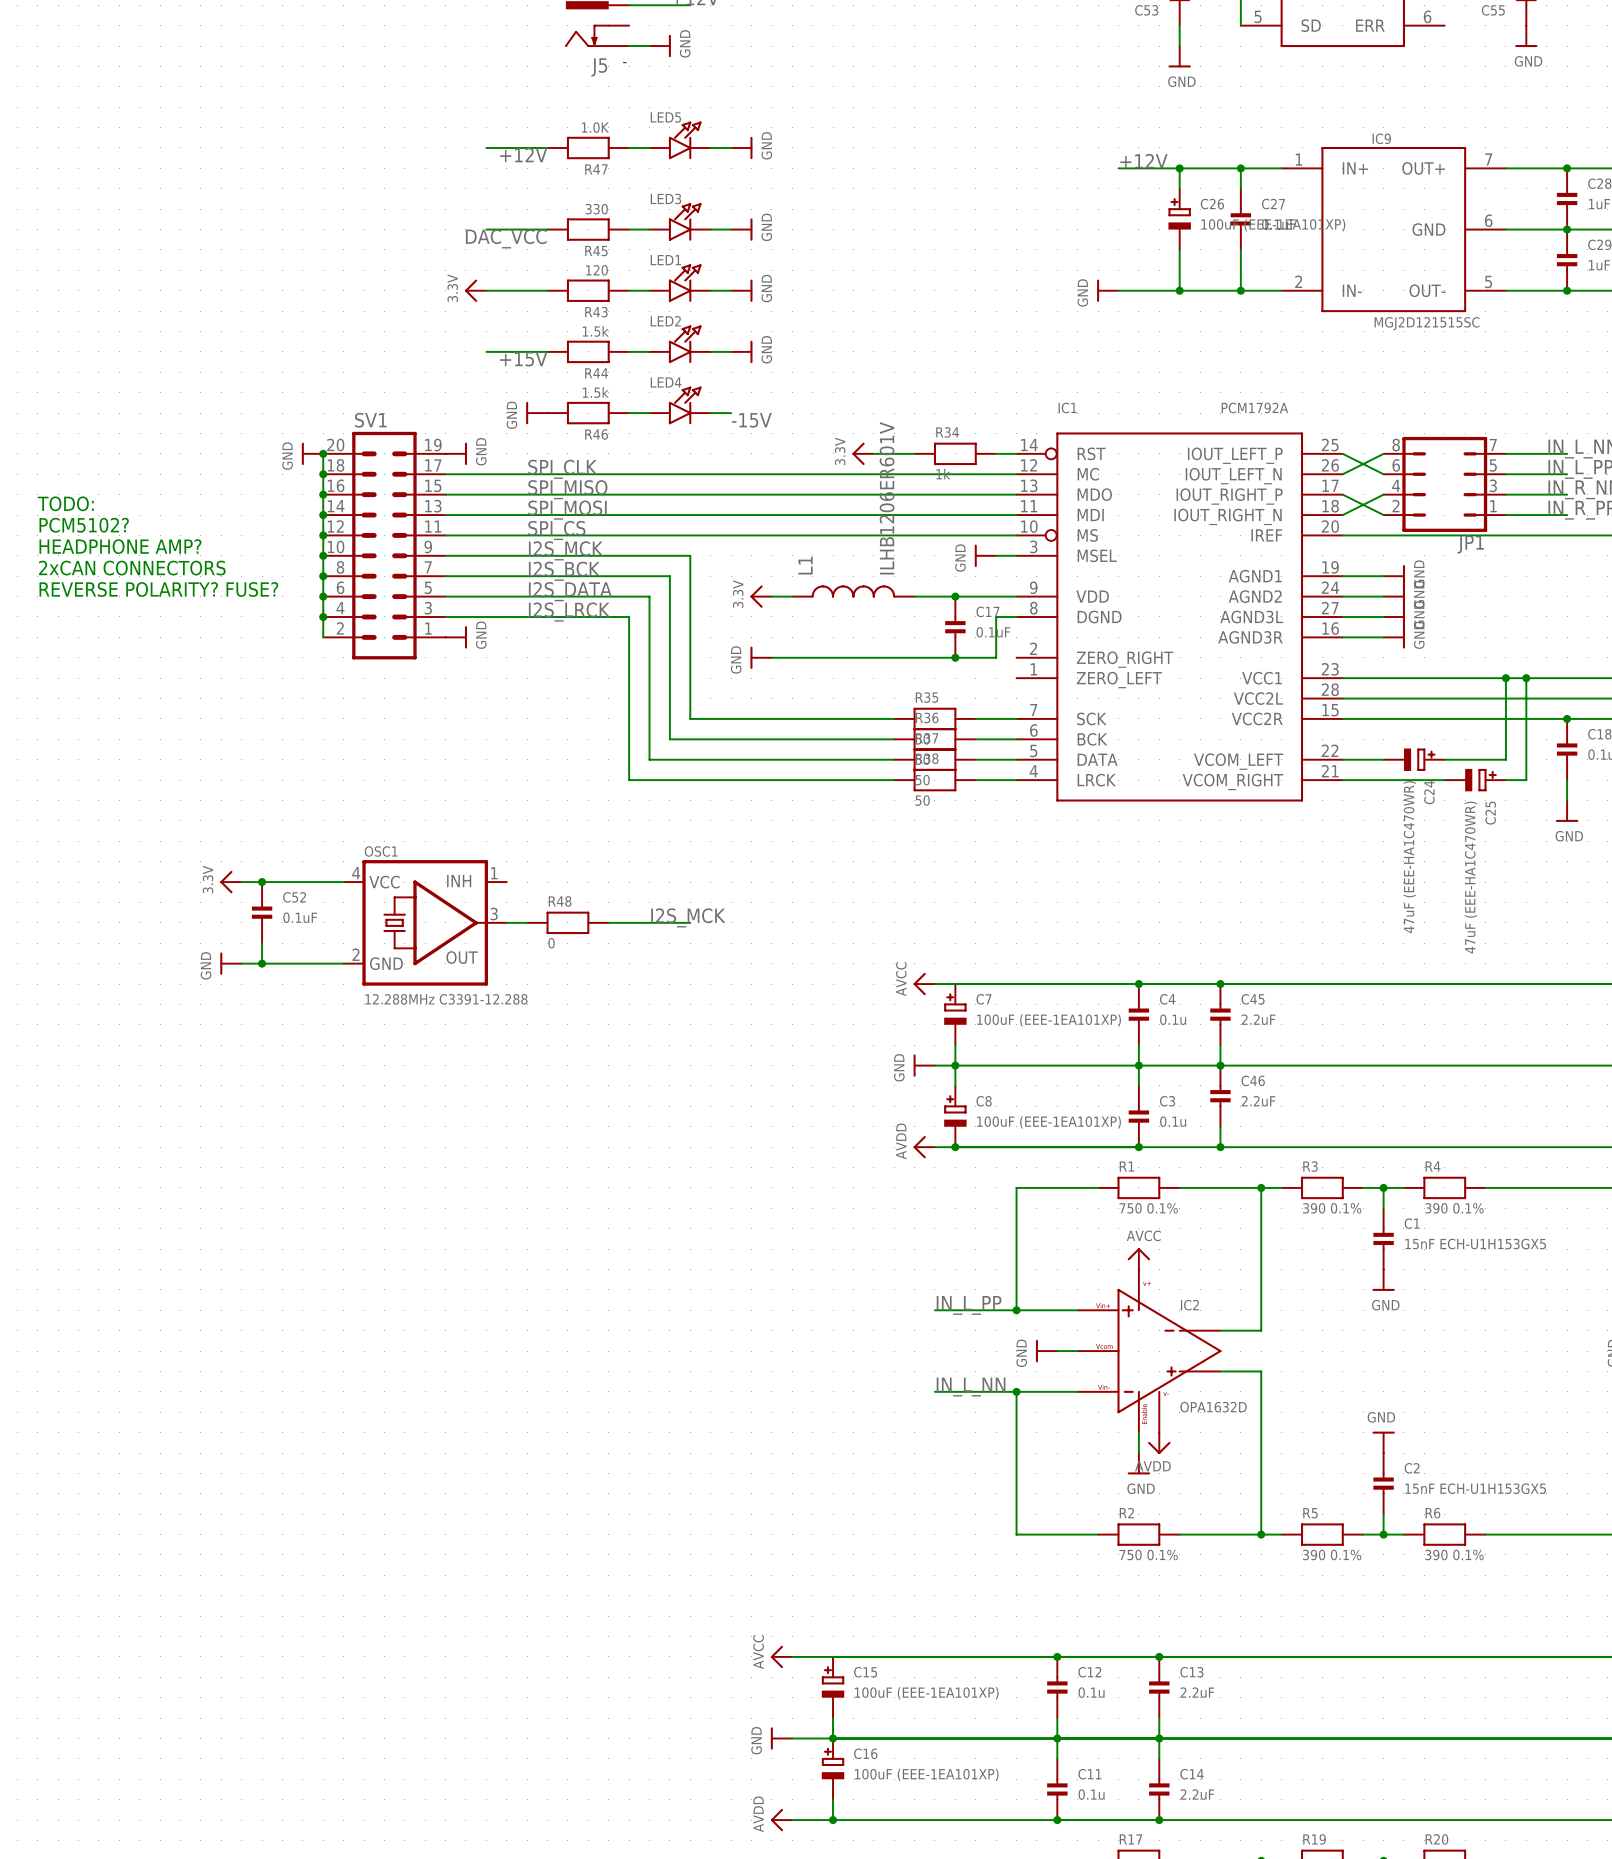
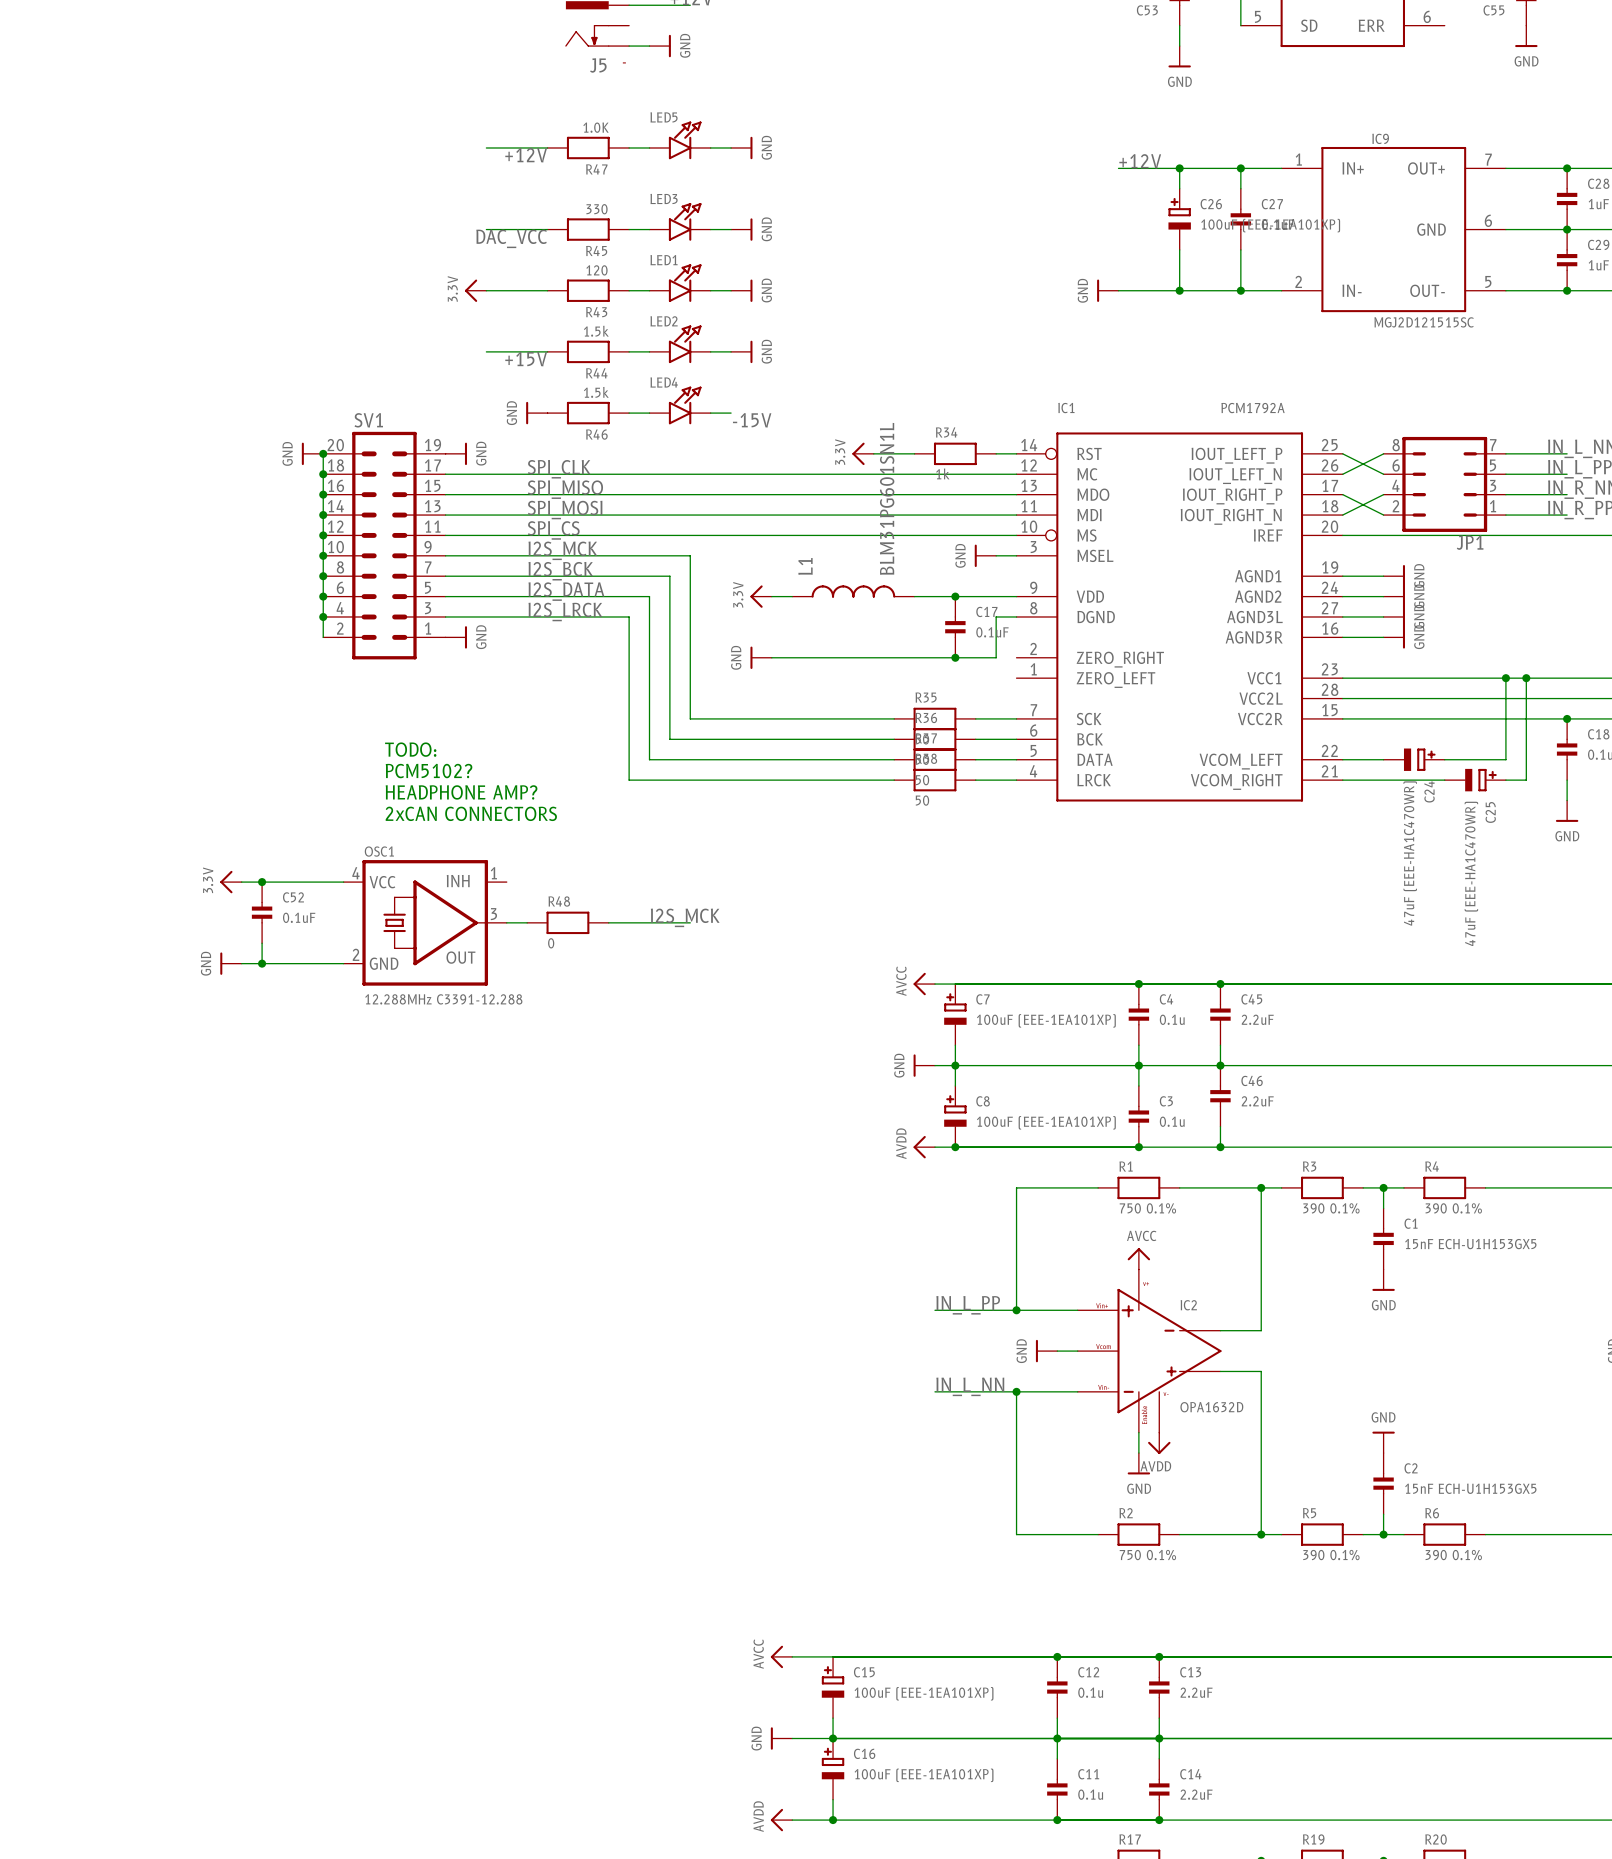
L1 value: ILHB1206ER601V (887, 498) -> BLM31PG601SN1L (887, 498)
text: TODO: (65, 503) -> none
text: PCM5102? (84, 525) -> none
text: HEADPHONE AMP? (120, 546) -> none
text: 2xCAN CONNECTORS (132, 568) -> none
text: REVERSE POLARITY? FUSE? (158, 589) -> none
text: none -> TODO: (410, 749)
text: none -> PCM5102? (429, 771)
text: none -> HEADPHONE AMP? (461, 792)
text: none -> 2xCAN CONNECTORS (471, 813)

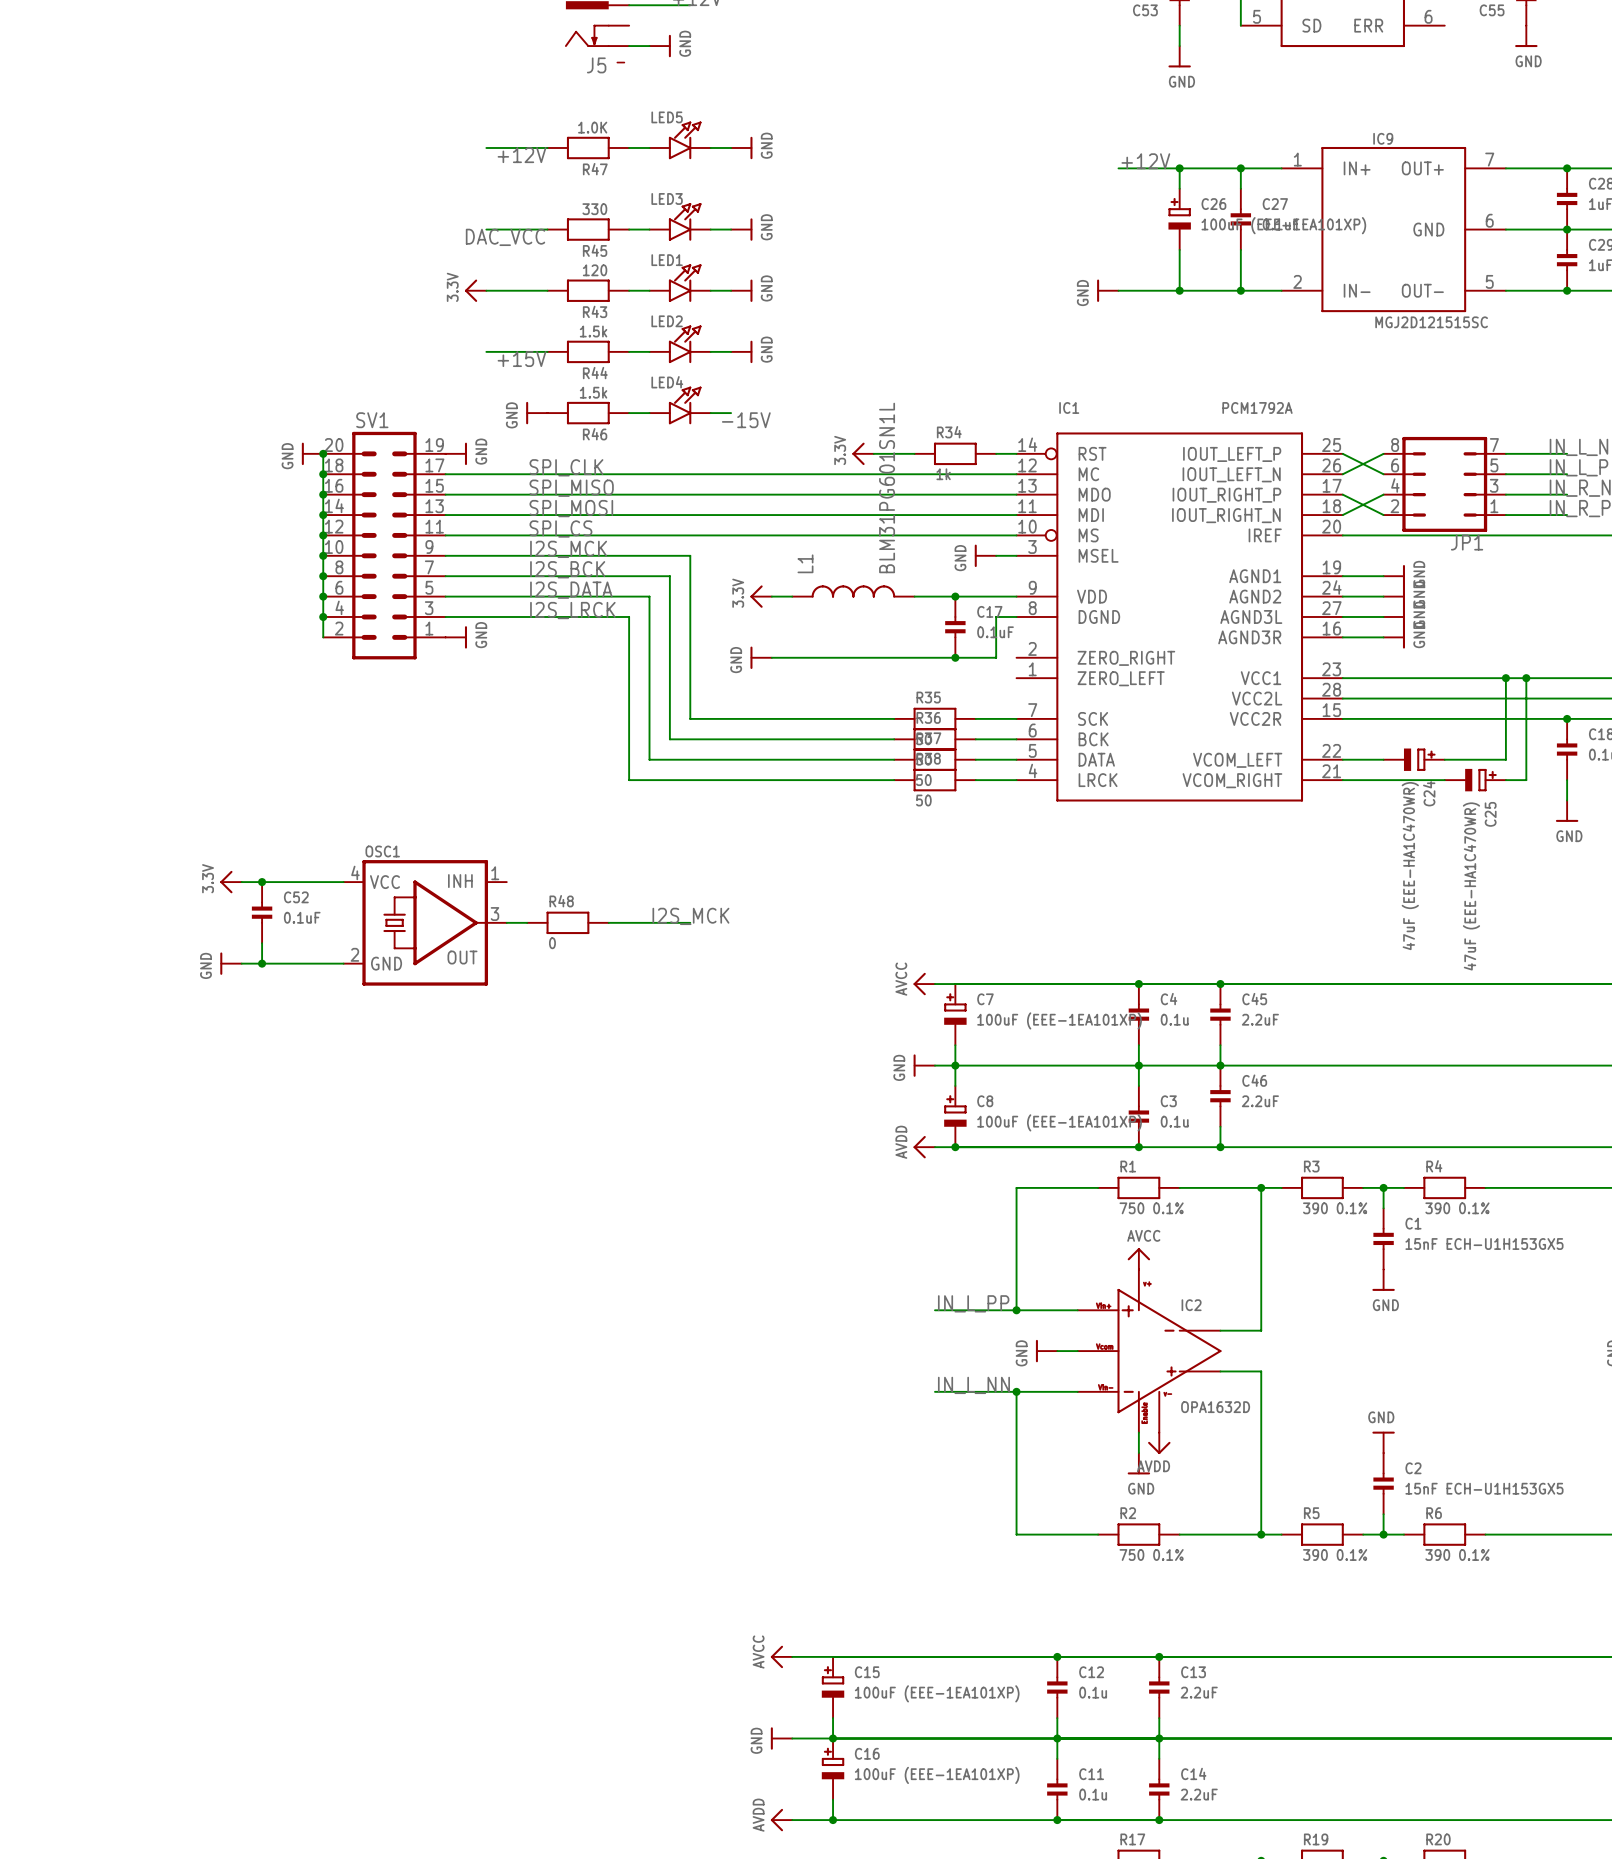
text: TODO: (410, 749) -> none
text: PCM5102? (429, 771) -> none
text: HEADPHONE AMP? (461, 792) -> none
text: 2xCAN CONNECTORS (471, 813) -> none
OSC1 value: 12.288MHz C3391-12.288 (443, 999) -> none

